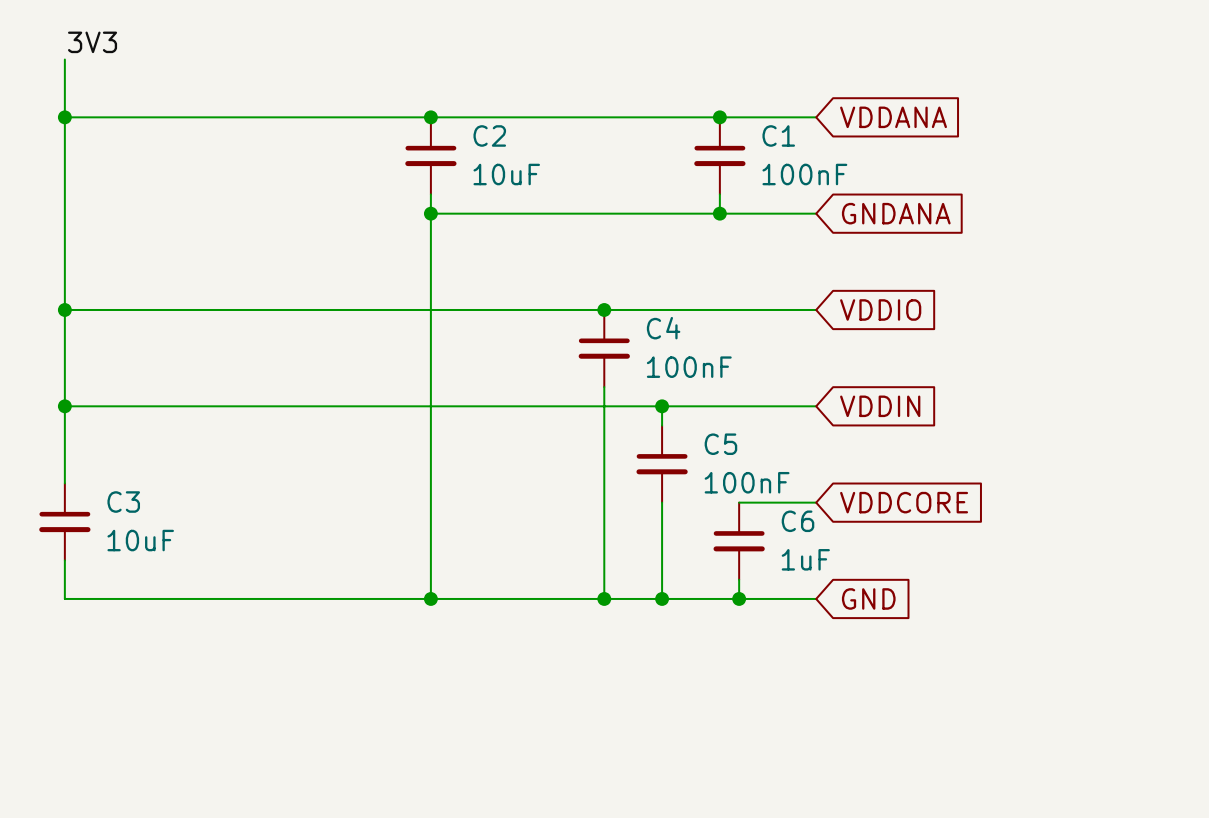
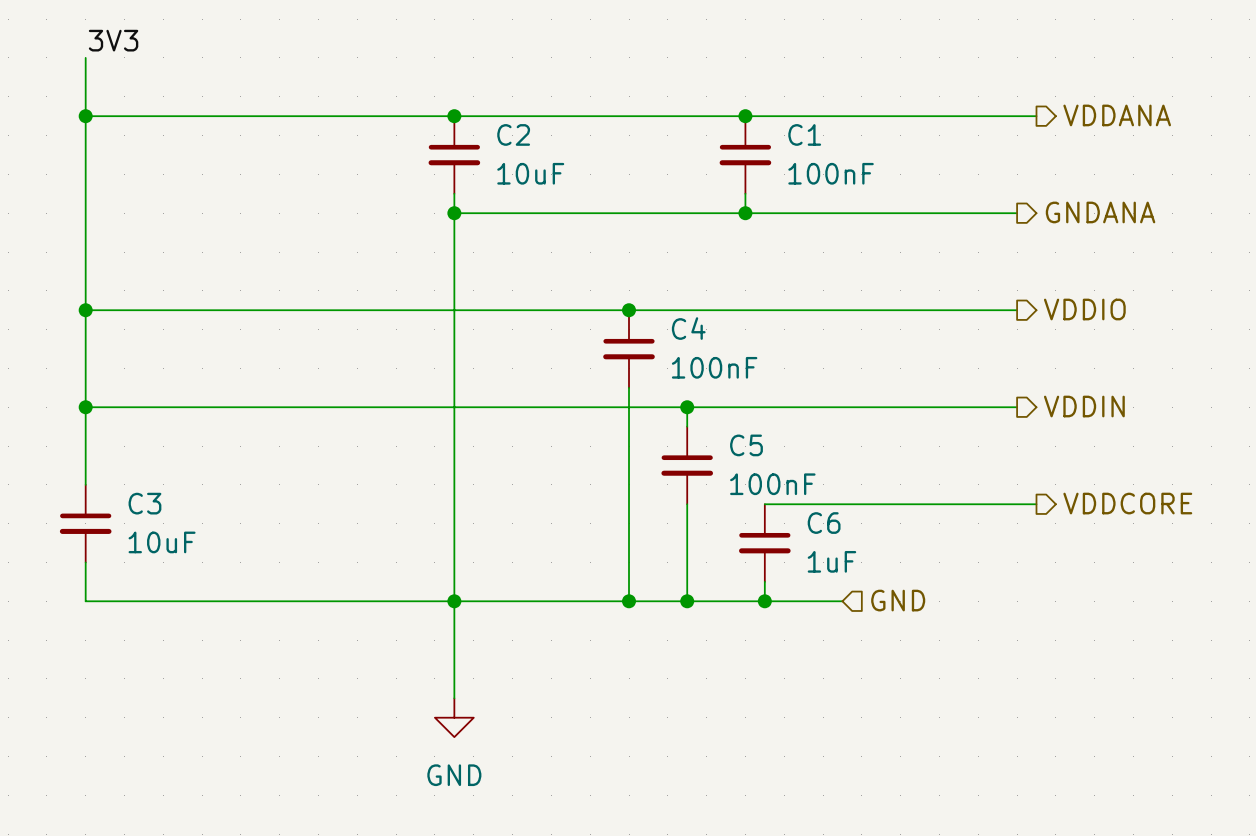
hierarchical label: none -> VDDANA (1117, 115)
wire: none -> (842, 116) (1036, 116)
global label: VDDANA (893, 117) -> none
hierarchical label: none -> GNDANA (1100, 212)
wire: none -> (842, 213) (1017, 213)
global label: GNDANA (896, 213) -> none
wire: none -> (842, 310) (1017, 310)
global label: VDDIO (880, 309) -> none
hierarchical label: none -> VDDIO (1084, 309)
hierarchical label: none -> VDDIN (1084, 406)
wire: none -> (842, 407) (1017, 407)
global label: VDDIN (880, 406) -> none
hierarchical label: none -> VDDCORE (1127, 503)
wire: none -> (842, 504) (1036, 504)
global label: VDDCORE (904, 502) -> none
wire: none -> (454, 601) (454, 698)
global label: GND (868, 598) -> none
hierarchical label: none -> GND (898, 600)
power symbol: none -> GND (454, 717)

